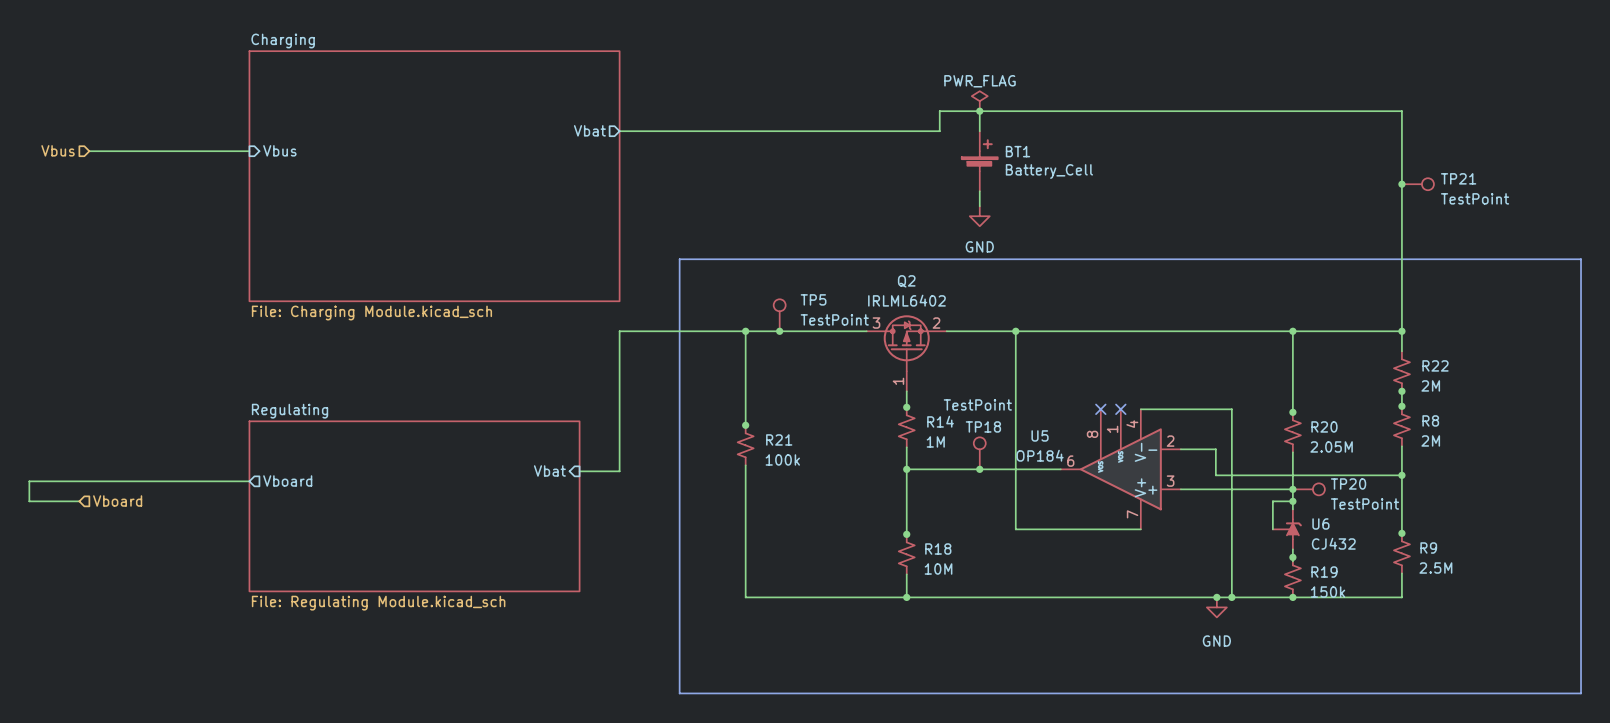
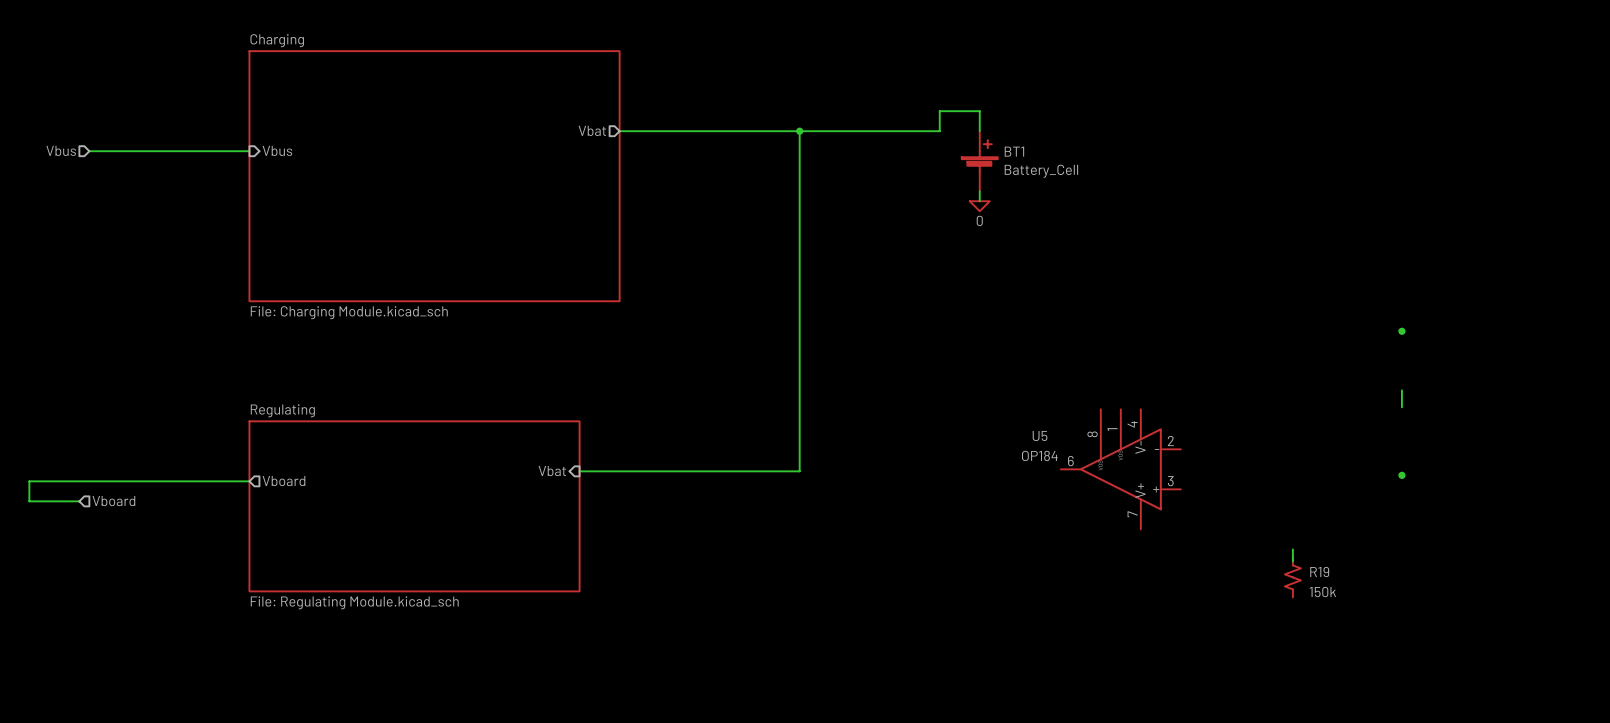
power symbol: PWR_FLAG (979, 101) -> none
wire: (979, 111) (1401, 111) (1401, 351) -> none
junction: (979, 111) -> none
junction: none -> (799, 131)
junction: (1401, 184) -> none
TP21: TestPoint (1417, 184) -> none
wire: (979, 201) (979, 206) -> none
power symbol: none -> 0 (979, 206)
power symbol: GND (979, 216) -> none
line: (679, 259) (1581, 259) (1581, 693) (679, 693) (679, 259) -> none
TP5: TestPoint (779, 315) -> none
wire: (745, 331) (745, 426) -> none
junction: (745, 331) -> none
junction: (779, 331) -> none
wire: (866, 331) (619, 331) (619, 471) -> (799, 131) (799, 471) (619, 471)
wire: (946, 331) (1401, 331) -> none
wire: (1015, 331) (1015, 529) (1140, 529) -> none
junction: (1015, 331) -> none
wire: (1292, 331) (1292, 413) -> none
junction: (1292, 331) -> none
Q2: IRLML6402 (906, 353) -> none
R22: 2M (1401, 371) -> none
wire: (906, 391) (906, 408) -> none
junction: (1401, 391) -> none
junction: (1401, 406) -> none
junction: (906, 407) -> none
no-connect mark: (1100, 409) -> none
no-connect mark: (1120, 409) -> none
wire: (1140, 409) (1231, 409) (1231, 597) -> none
junction: (1292, 412) -> none
junction: (745, 425) -> none
R8: 2M (1401, 426) -> none
R14: 1M (906, 427) -> none
R20: 2.05M (1292, 432) -> none
R21: 100k (745, 445) -> none
wire: (1401, 446) (1401, 534) -> none
wire: (906, 447) (906, 535) -> none
wire: (1180, 449) (1215, 449) (1215, 475) (1401, 475) -> none
wire: (1292, 452) (1292, 509) -> none
TP18: TestPoint (979, 453) -> none
wire: (745, 465) (745, 597) (1401, 597) (1401, 573) -> none
wire: (906, 469) (1060, 469) -> none
junction: (906, 469) -> none
junction: (979, 469) -> none
wire: (1180, 489) (1292, 489) -> none
junction: (1292, 489) -> none
TP20: TestPoint (1308, 489) -> none
wire: (1292, 501) (1272, 501) (1272, 529) -> none
junction: (1292, 501) -> none
U6: CJ432 (1287, 529) -> none
junction: (1401, 533) -> none
junction: (906, 534) -> none
R9: 2.5M (1401, 553) -> none
R18: 10M (906, 554) -> none
junction: (1292, 557) -> none
wire: (906, 574) (906, 597) -> none
junction: (906, 597) -> none
junction: (1216, 597) -> none
junction: (1231, 597) -> none
junction: (1292, 597) -> none
power symbol: GND (1216, 607) -> none

